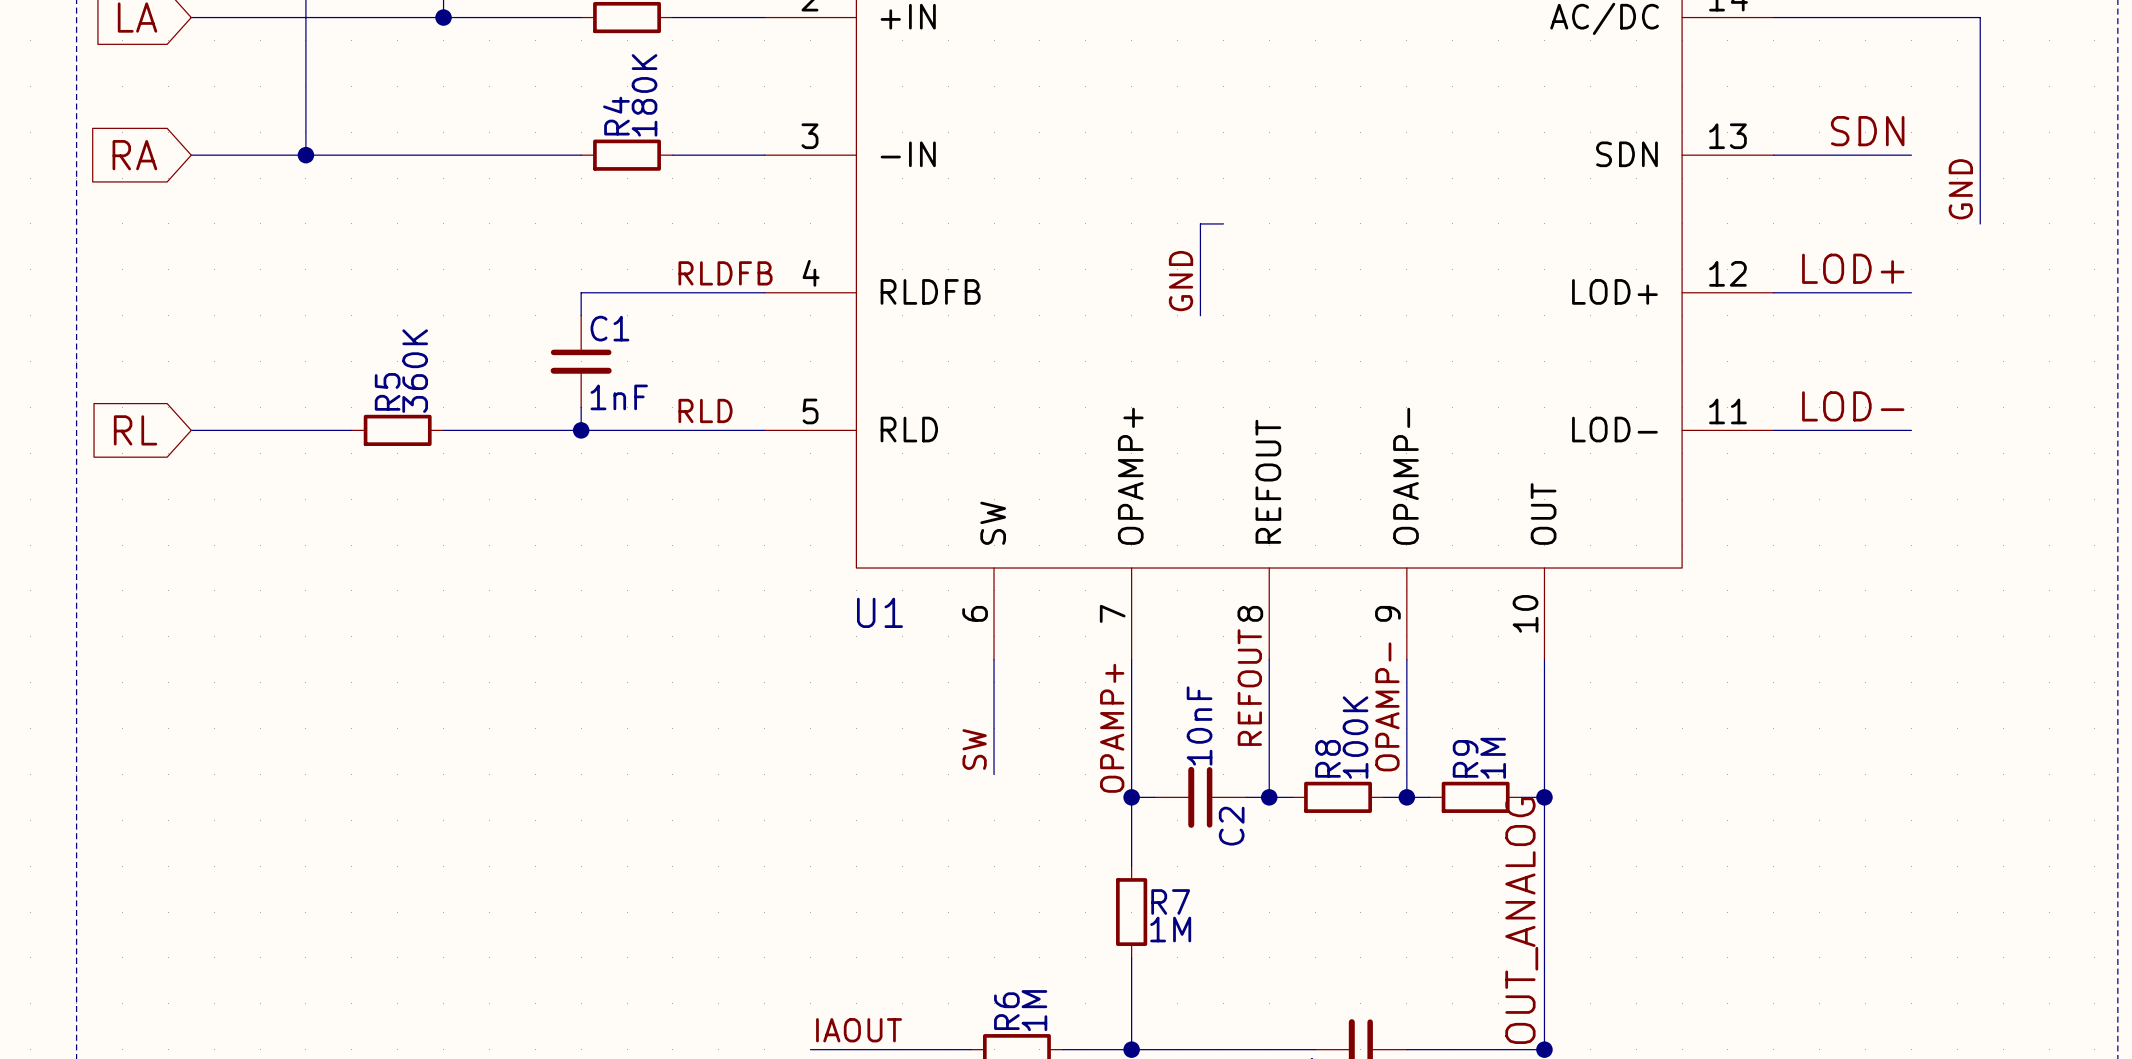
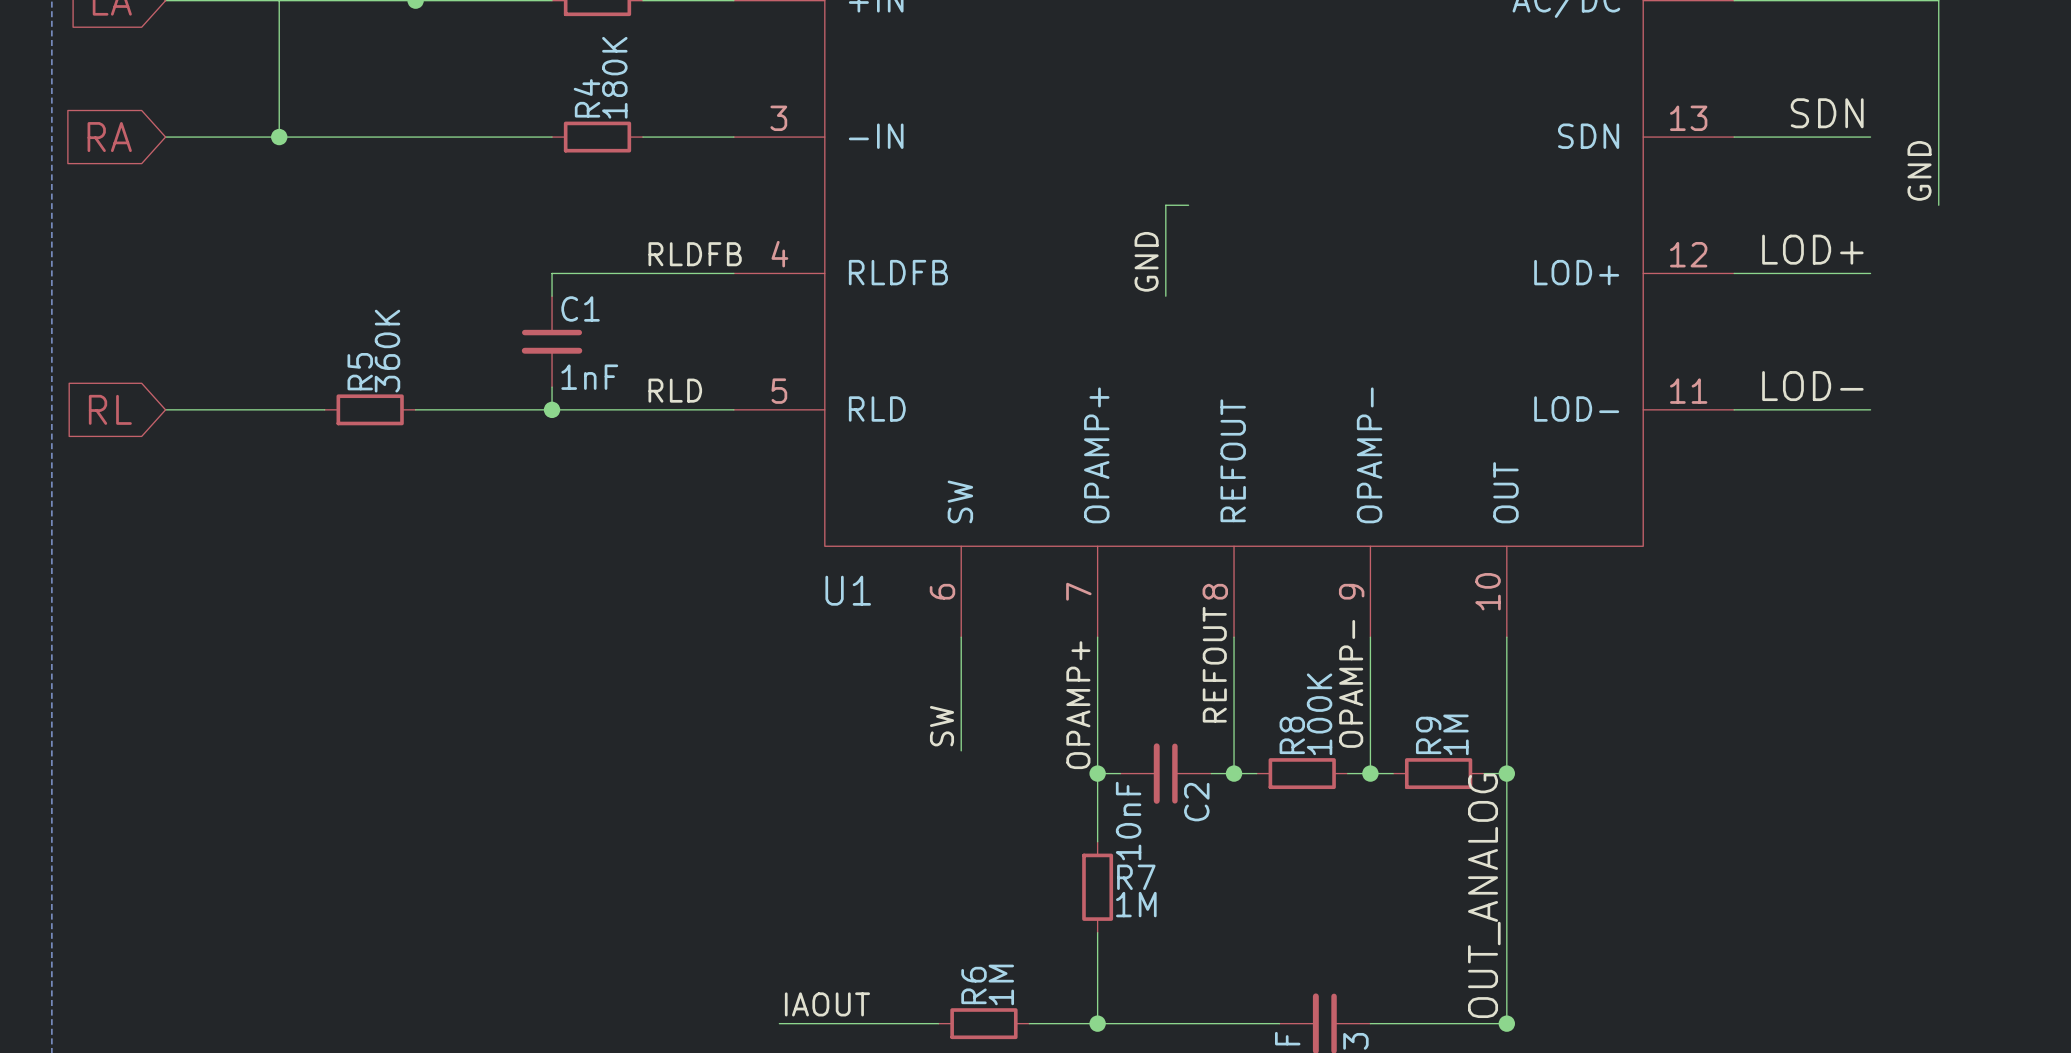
C2 value position: 10nF (1199, 725) -> 10nF (1128, 821)

